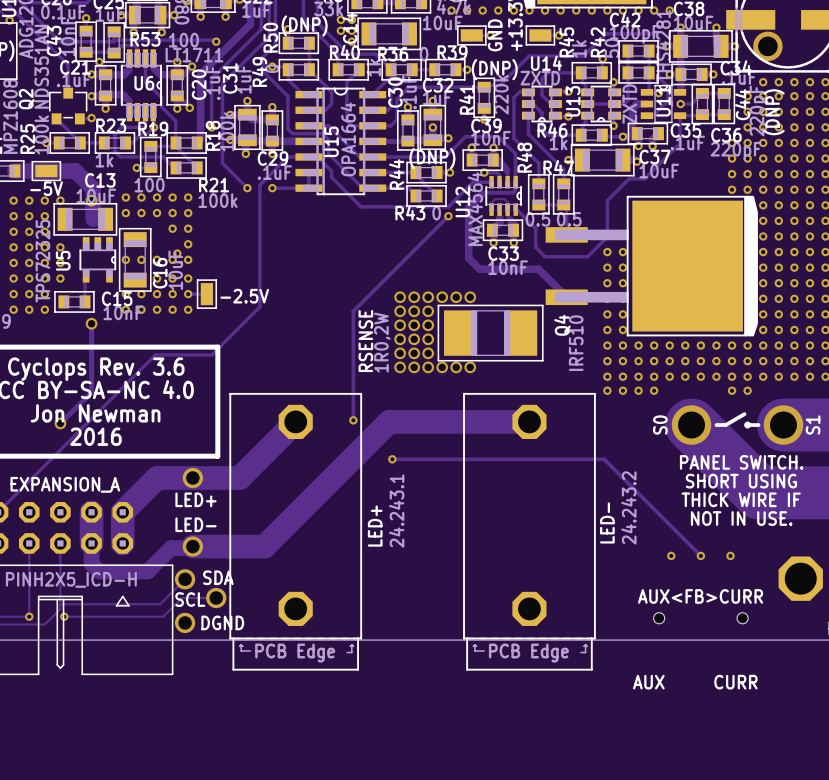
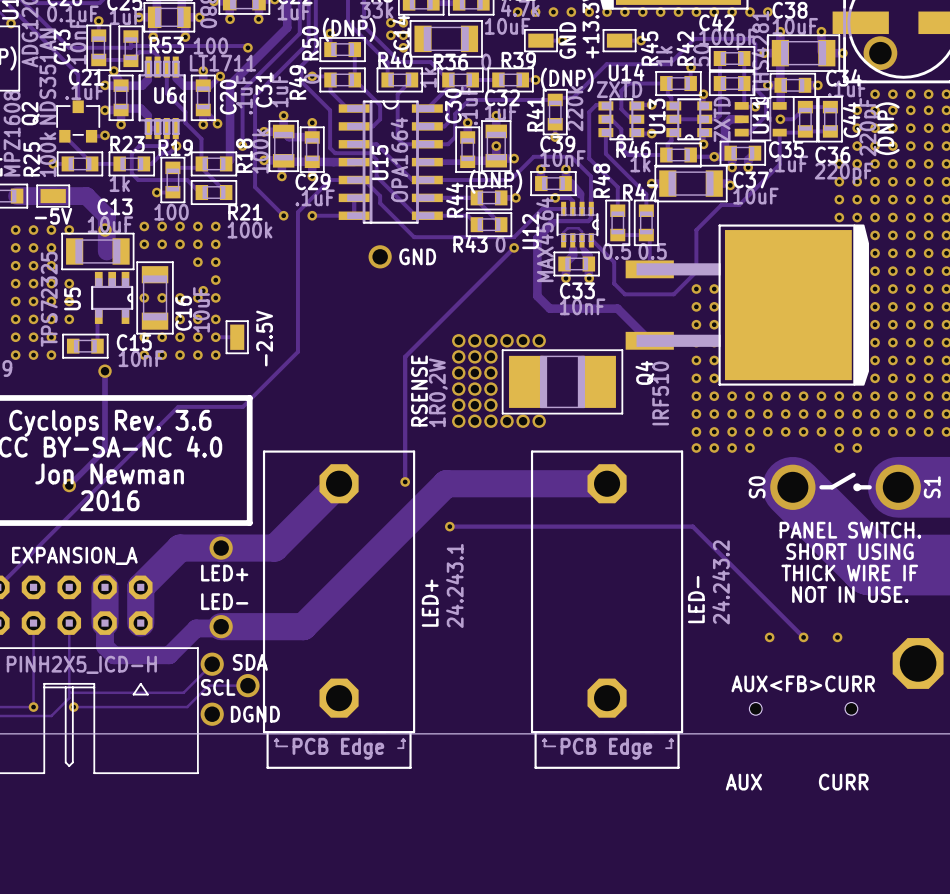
via: none -> (380, 256)
text: none -> GND (417, 256)
-2.5V name rotation: 0° (244, 296) -> 90° counterclockwise (264, 338)

